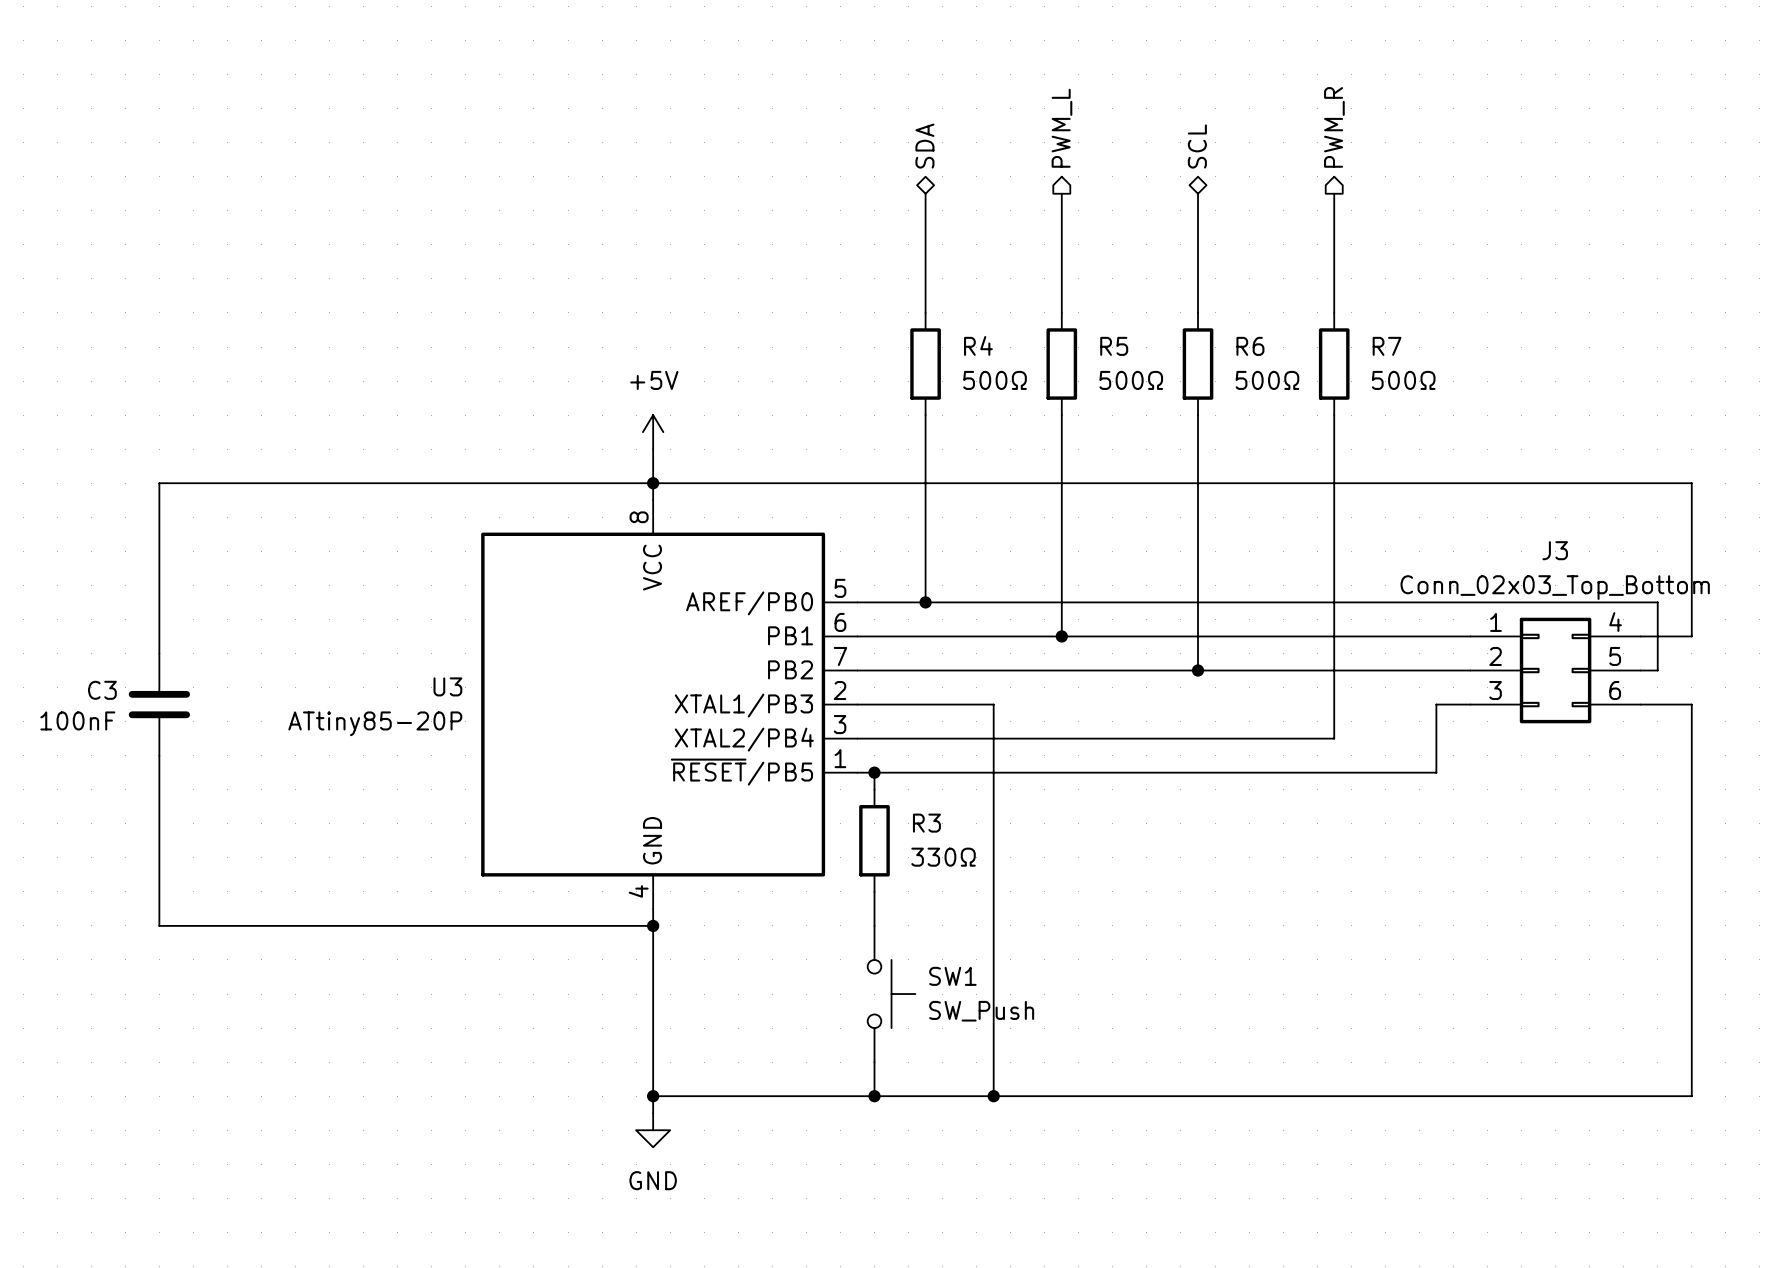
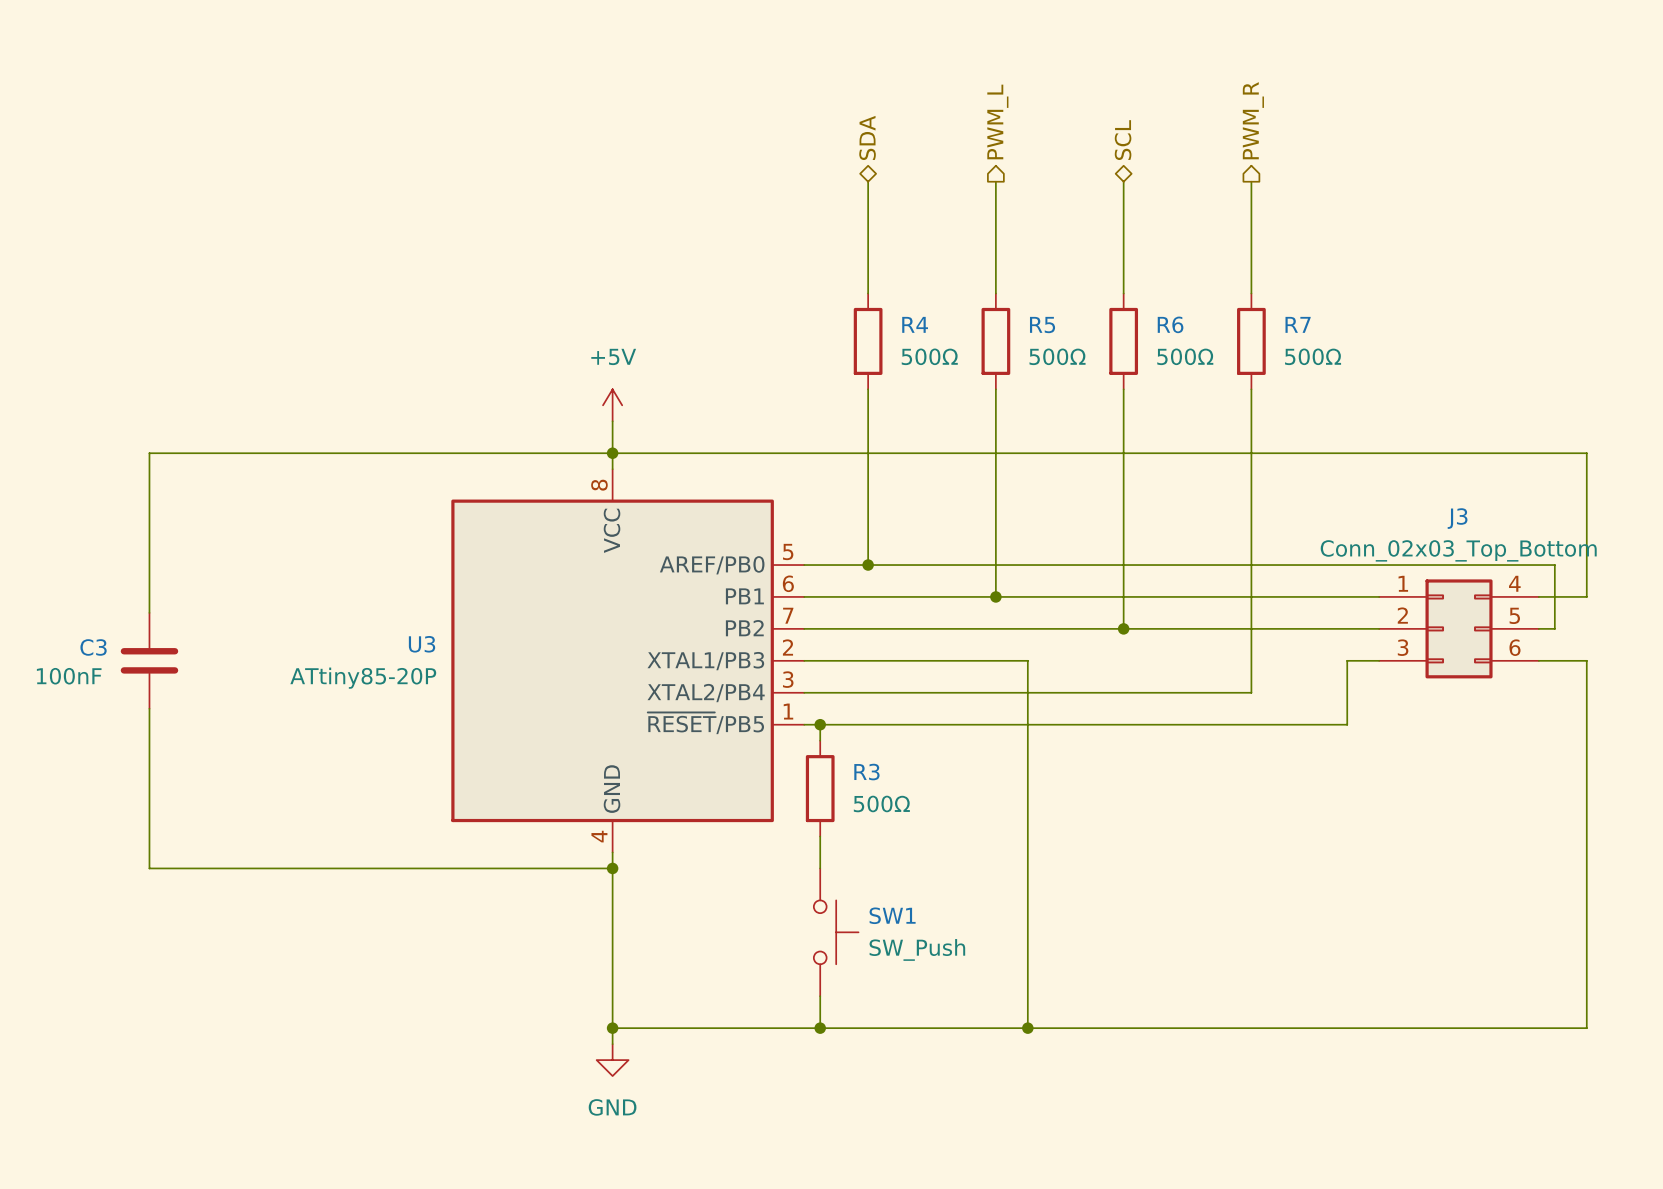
wire: (993, 704) (993, 1096) -> (932, 660) (1027, 660) (1027, 1028)
R3 value: 330Ω (943, 857) -> 500Ω (881, 803)
junction: (993, 1096) -> none
junction: none -> (1027, 1028)

